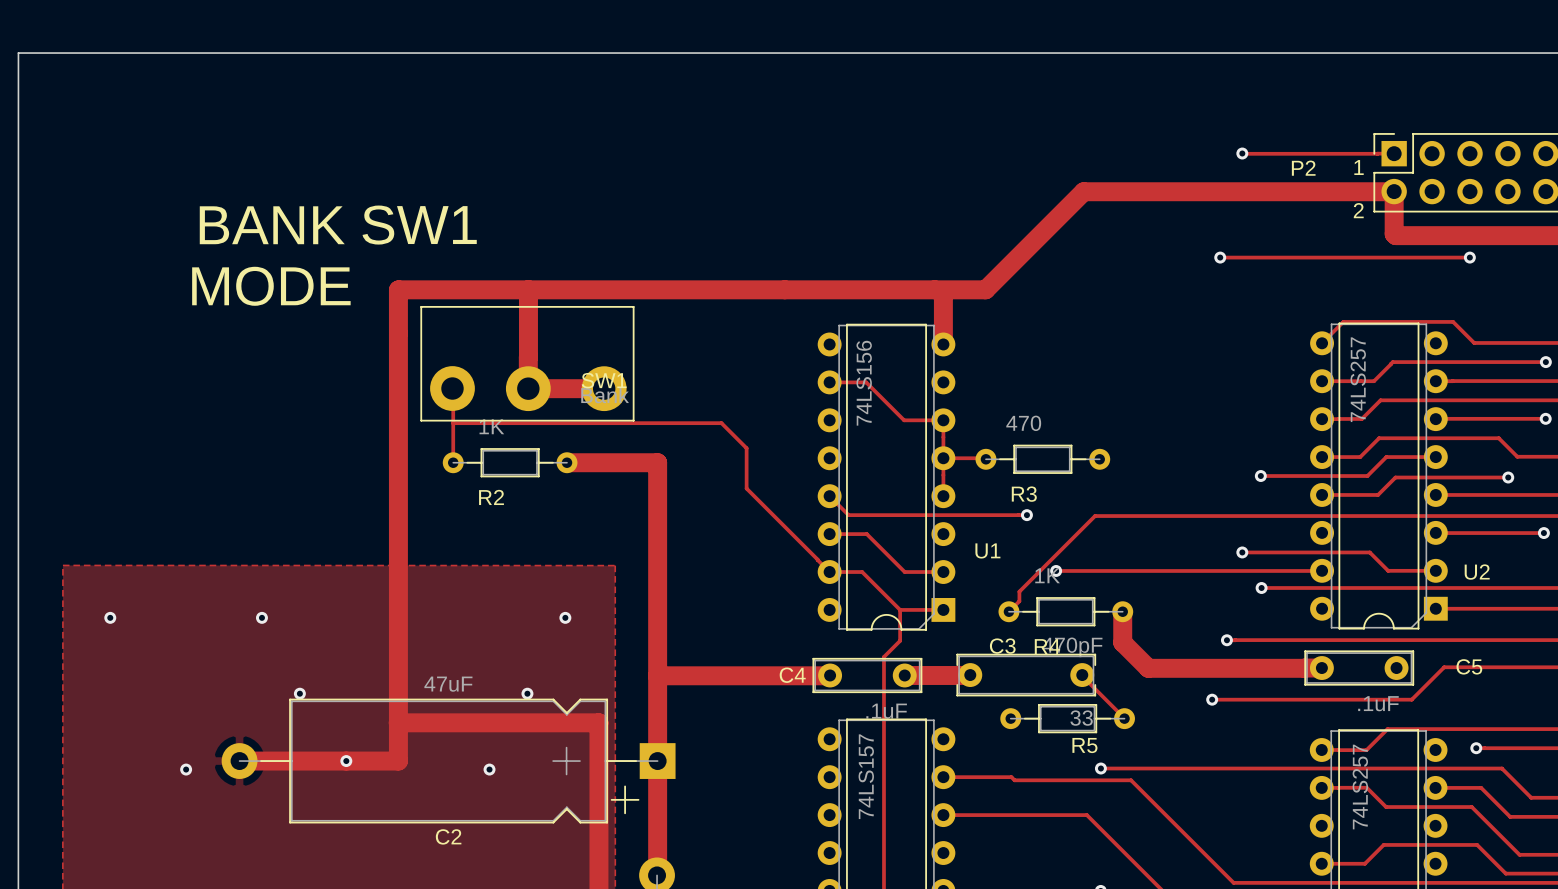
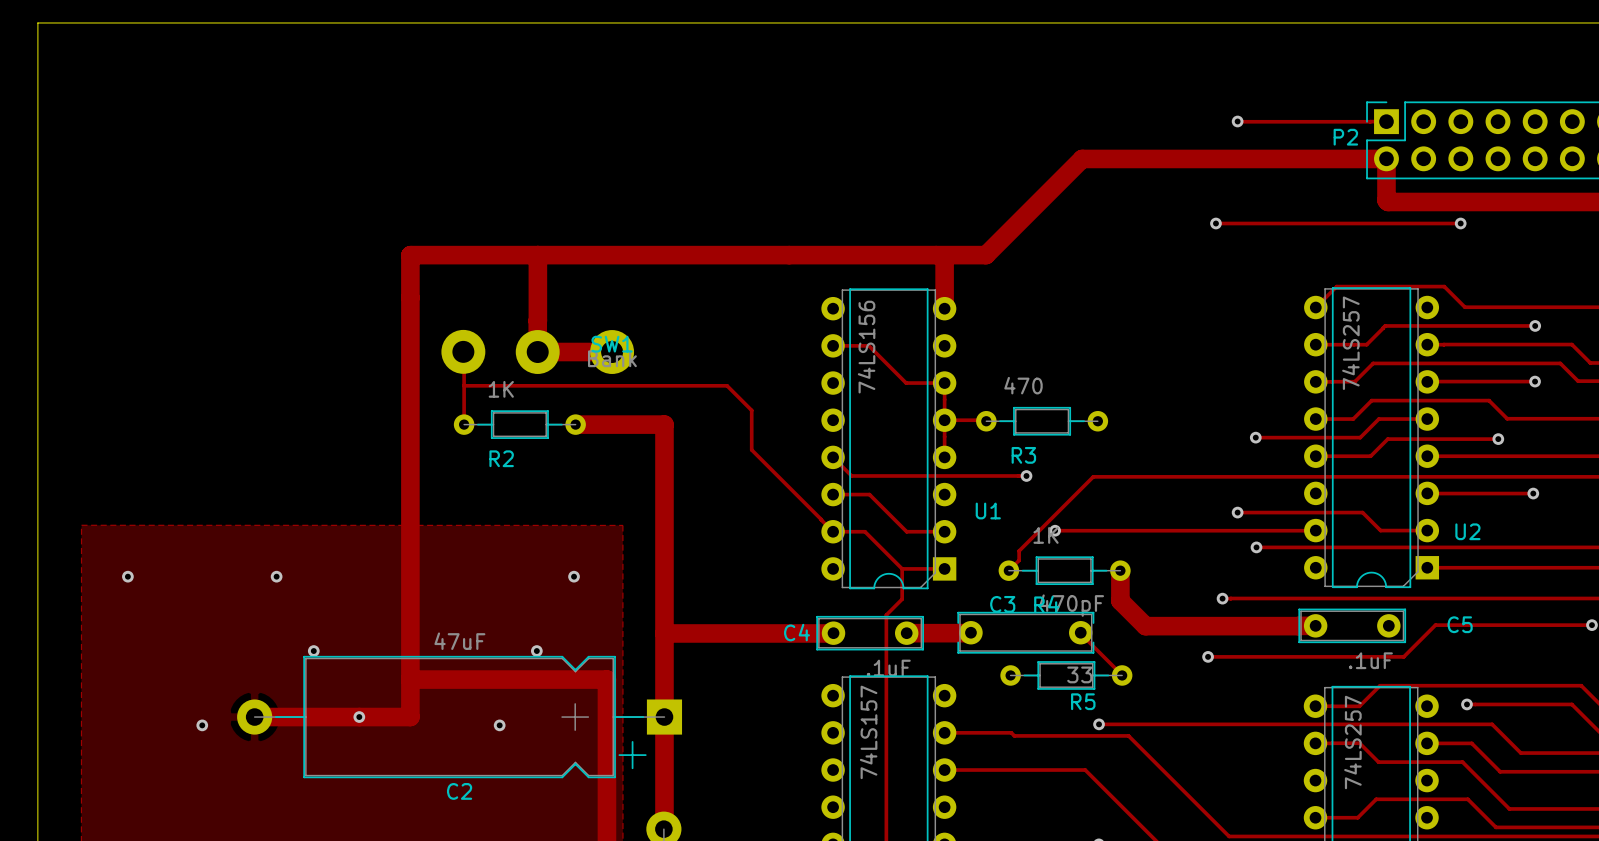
text: 1 (1359, 167) -> none
P2 name position: P2 (1303, 168) -> P2 (1345, 137)
text: 2 (1358, 210) -> none
text: BANK (272, 225) -> none
text: SW1 (419, 225) -> none
text: MODE (271, 286) -> none
line: (421, 306) (421, 420) (633, 420) (633, 306) (421, 306) -> none

